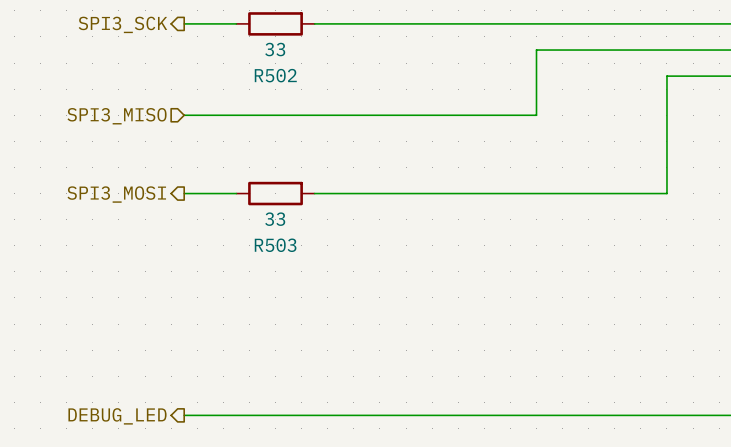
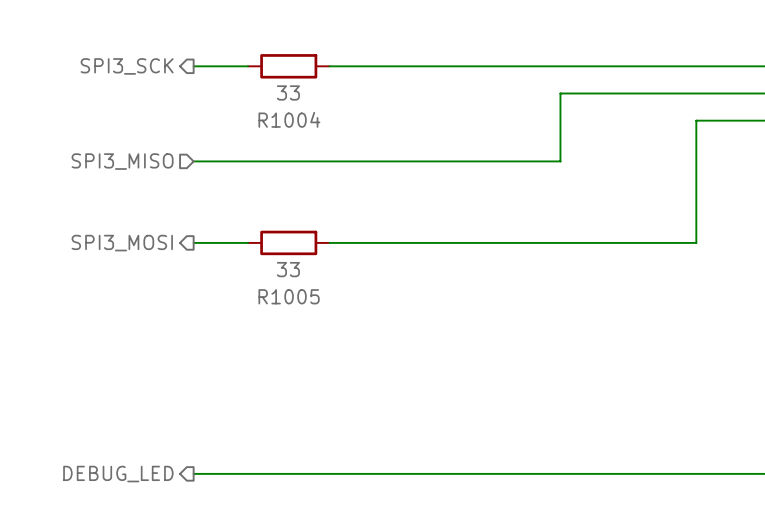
R502 name: R502 (275, 75) -> R1004 (289, 119)
R503 name: R503 (275, 245) -> R1005 (289, 296)

